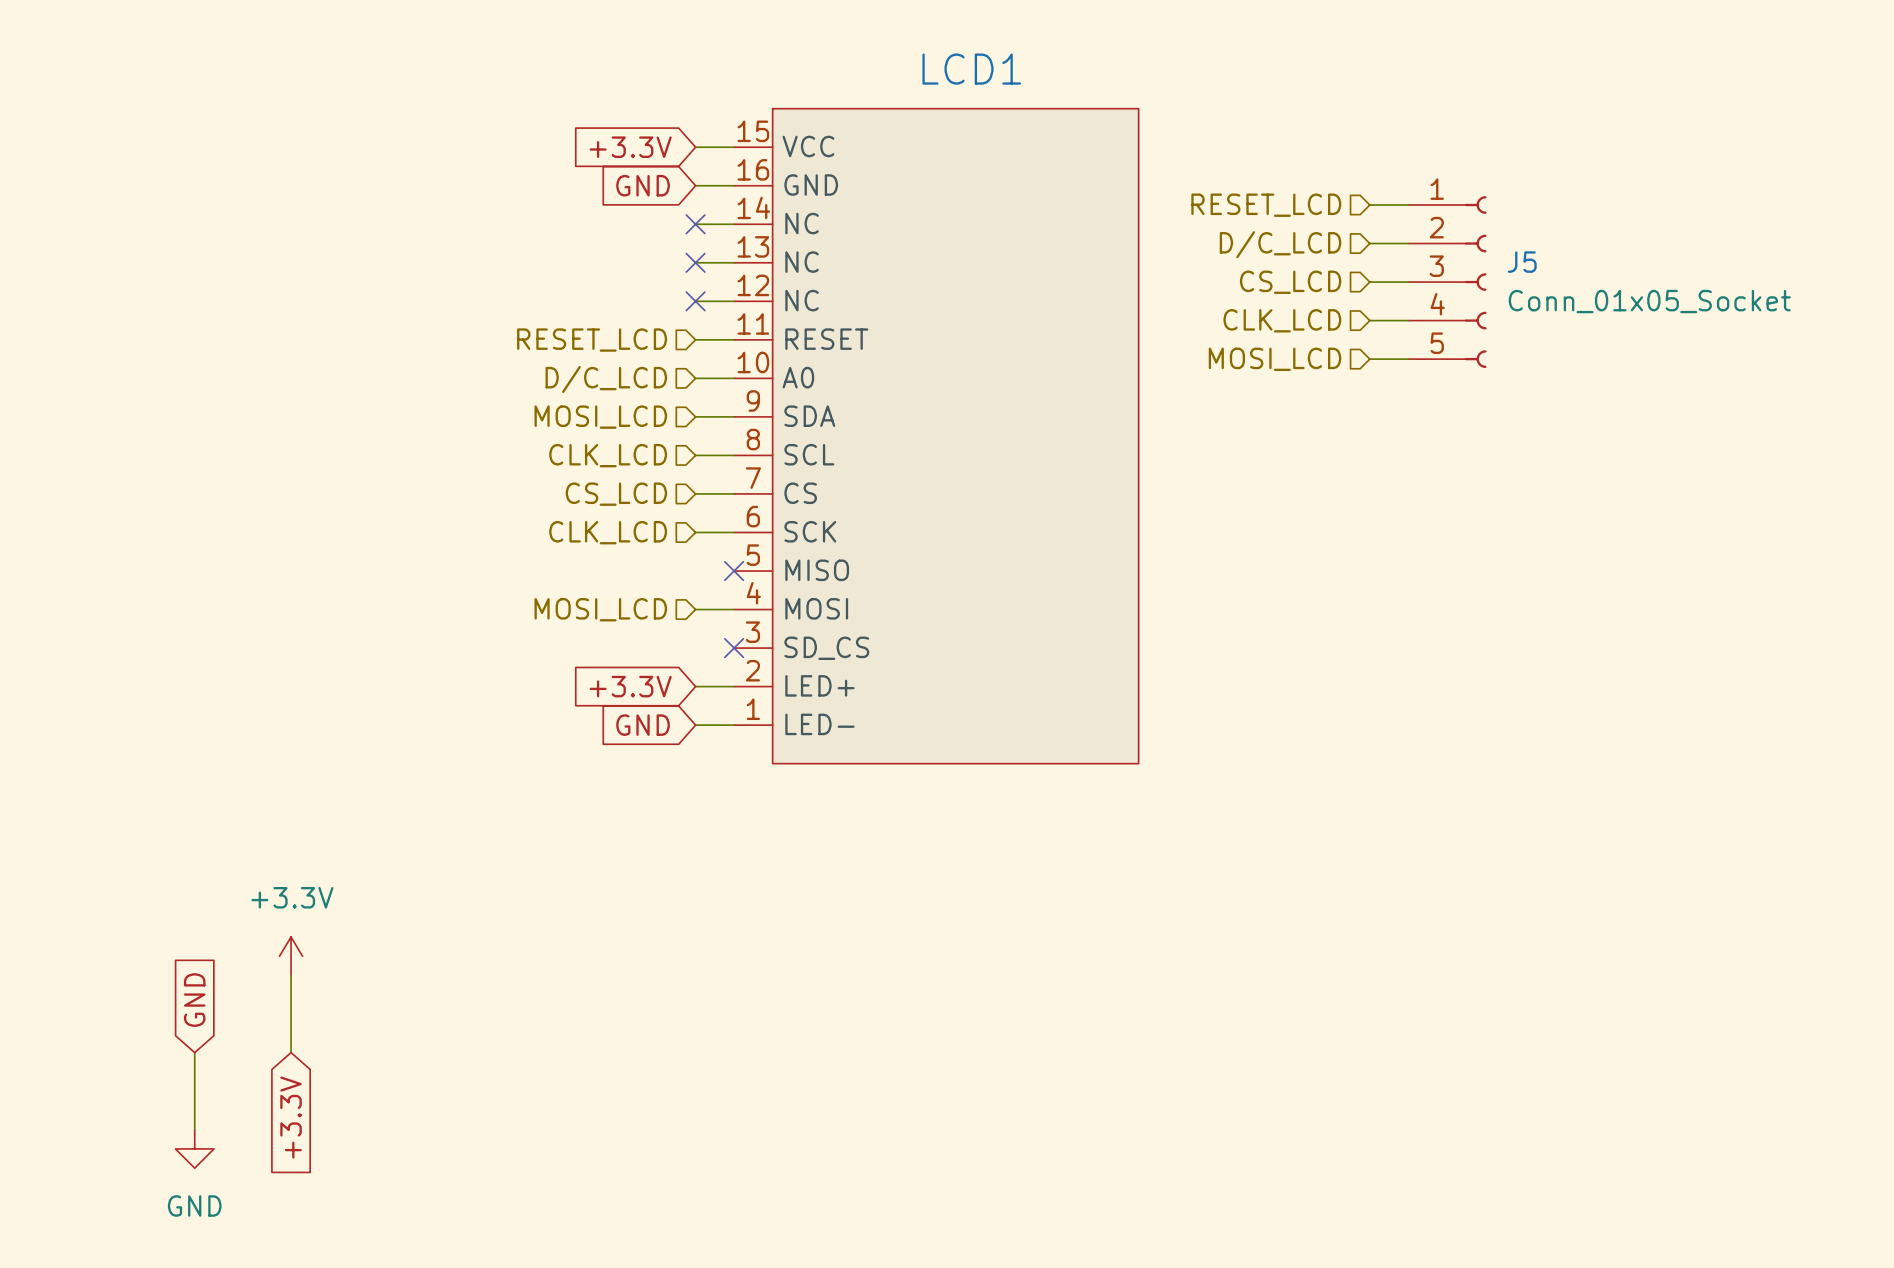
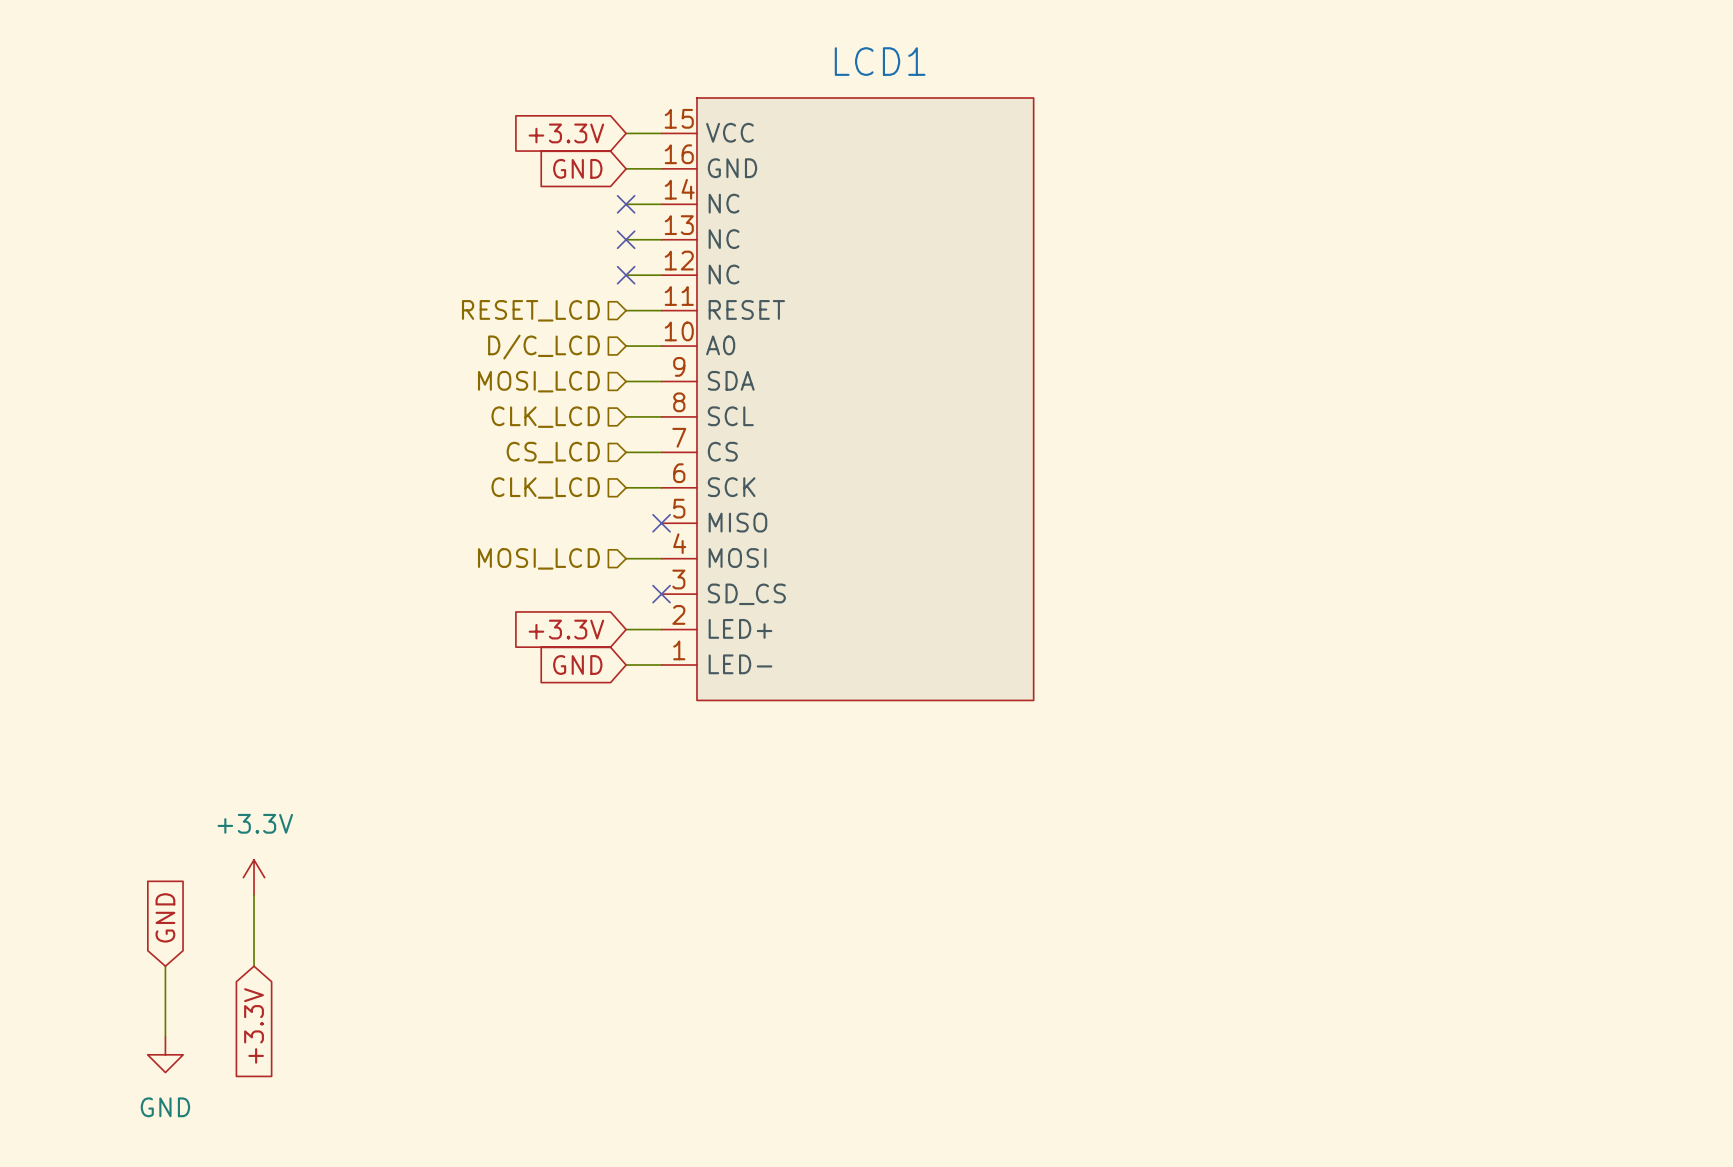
hierarchical label: RESET_LCD (1266, 205) -> none
wire: (1369, 205) (1408, 205) -> none
wire: (1369, 243) (1408, 243) -> none
hierarchical label: D/C_LCD (1280, 244) -> none
hierarchical label: CS_LCD (1290, 282) -> none
wire: (1369, 282) (1408, 282) -> none
J5: Conn_01x05_Socket (1447, 282) -> none
hierarchical label: CLK_LCD (1282, 320) -> none
wire: (1369, 320) (1408, 320) -> none
hierarchical label: MOSI_LCD (1275, 359) -> none
wire: (1369, 359) (1408, 359) -> none

